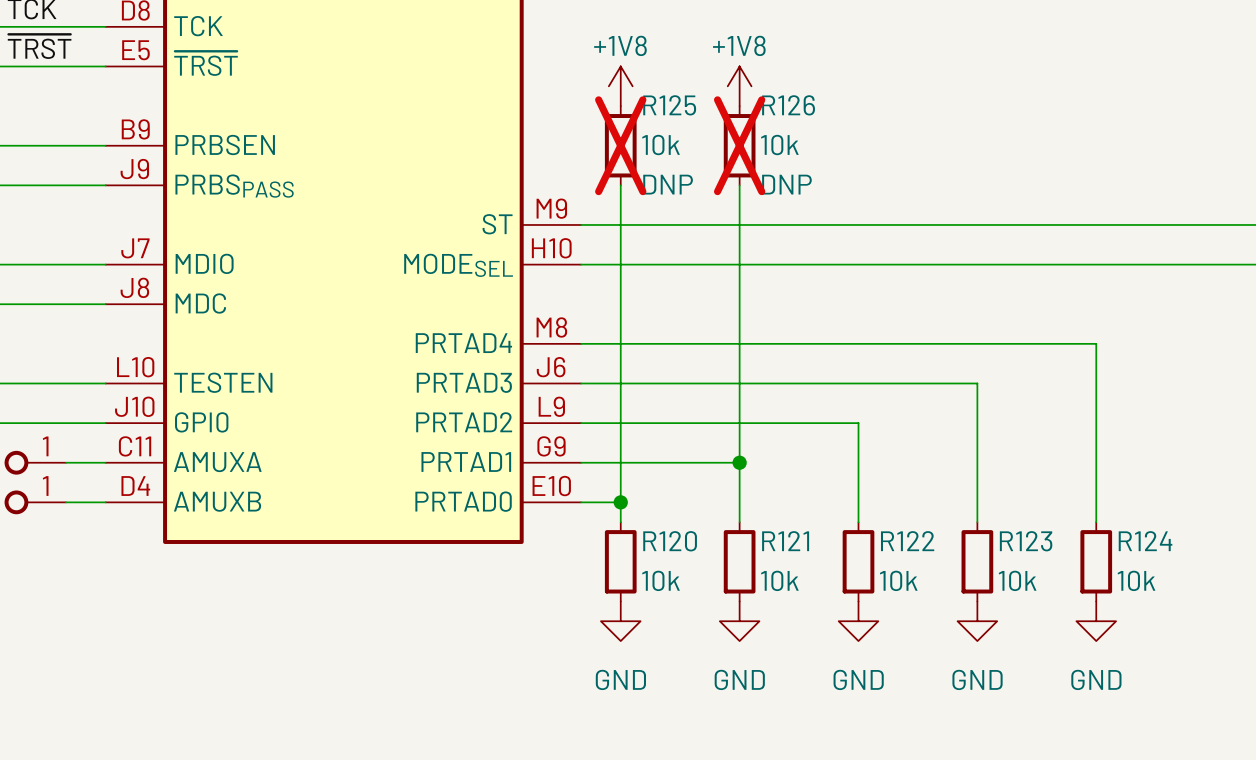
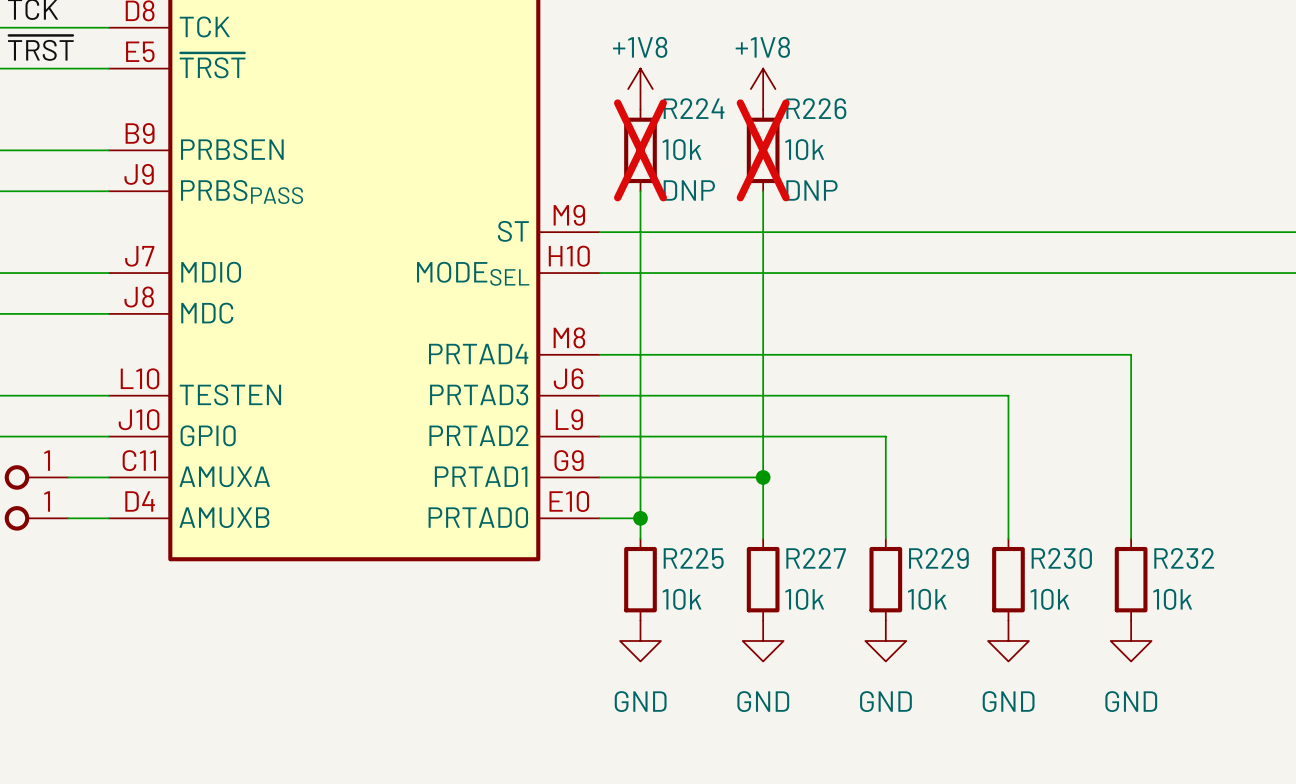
R125 name: R125 (669, 105) -> R224 (694, 108)
R126 name: R126 (788, 105) -> R226 (816, 108)
R120 name: R120 (670, 541) -> R225 (693, 558)
R121 name: R121 (785, 541) -> R227 (816, 558)
R122 name: R122 (907, 541) -> R229 (938, 558)
R123 name: R123 (1026, 541) -> R230 (1061, 558)
R124 name: R124 (1145, 541) -> R232 (1184, 558)

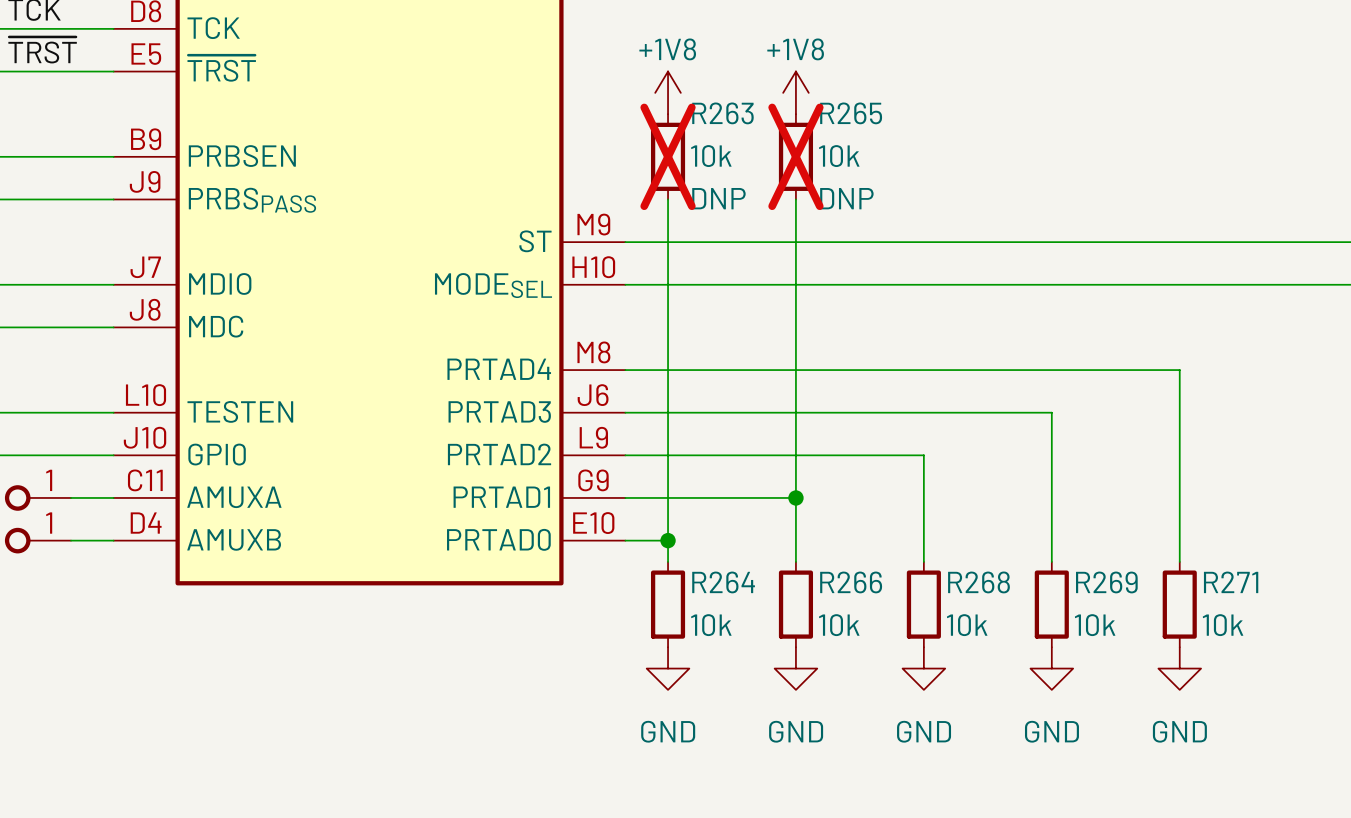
R224 name: R224 (694, 108) -> R263 (722, 113)
R226 name: R226 (816, 108) -> R265 (851, 113)
R225 name: R225 (693, 558) -> R264 (723, 582)
R227 name: R227 (816, 558) -> R266 (851, 582)
R229 name: R229 (938, 558) -> R268 (978, 582)
R230 name: R230 (1061, 558) -> R269 (1106, 582)
R232 name: R232 (1184, 558) -> R271 (1231, 582)

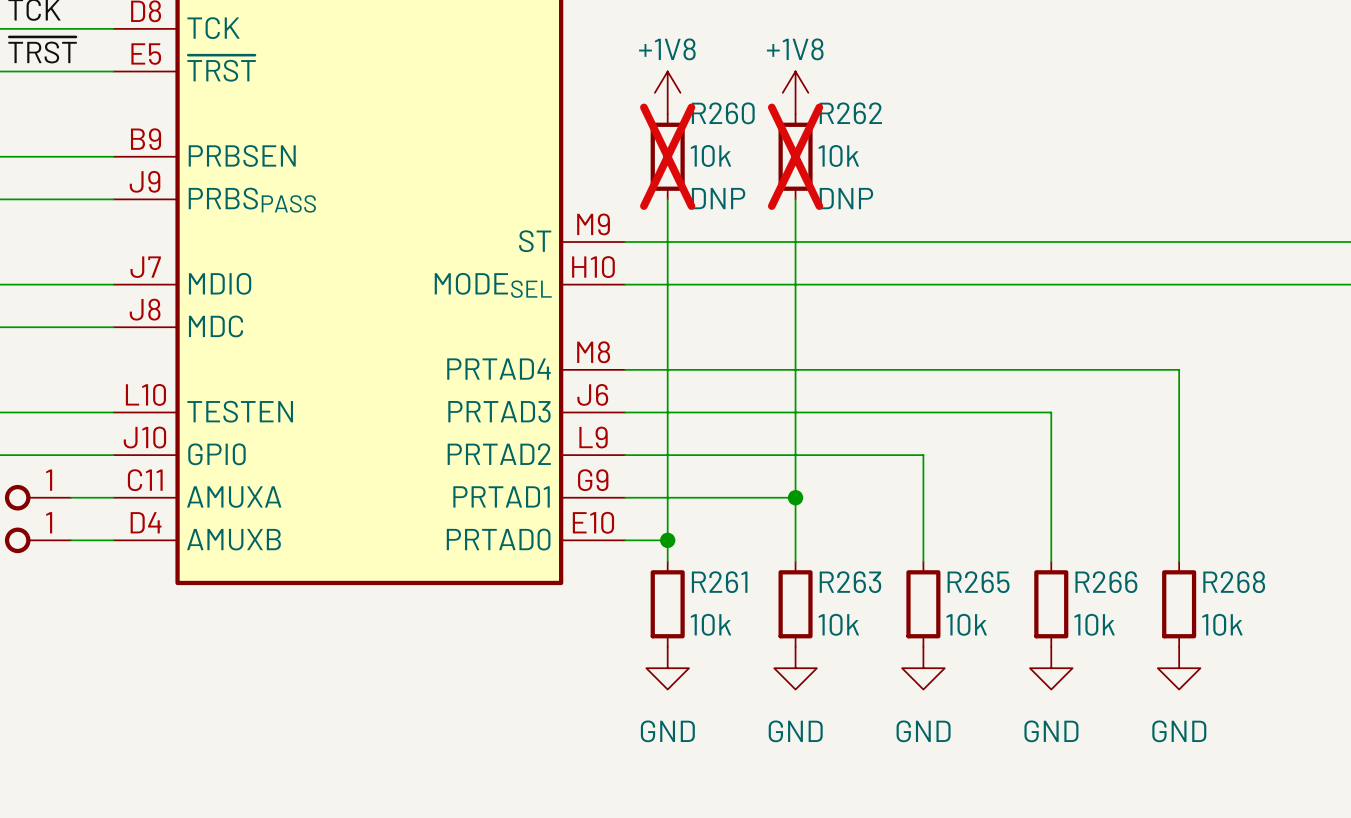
R263 name: R263 (722, 113) -> R260 (723, 113)
R265 name: R265 (851, 113) -> R262 (850, 113)
R264 name: R264 (723, 582) -> R261 (719, 582)
R266 name: R266 (851, 582) -> R263 (850, 582)
R268 name: R268 (978, 582) -> R265 (978, 582)
R269 name: R269 (1106, 582) -> R266 (1106, 582)
R271 name: R271 (1231, 582) -> R268 (1234, 582)

